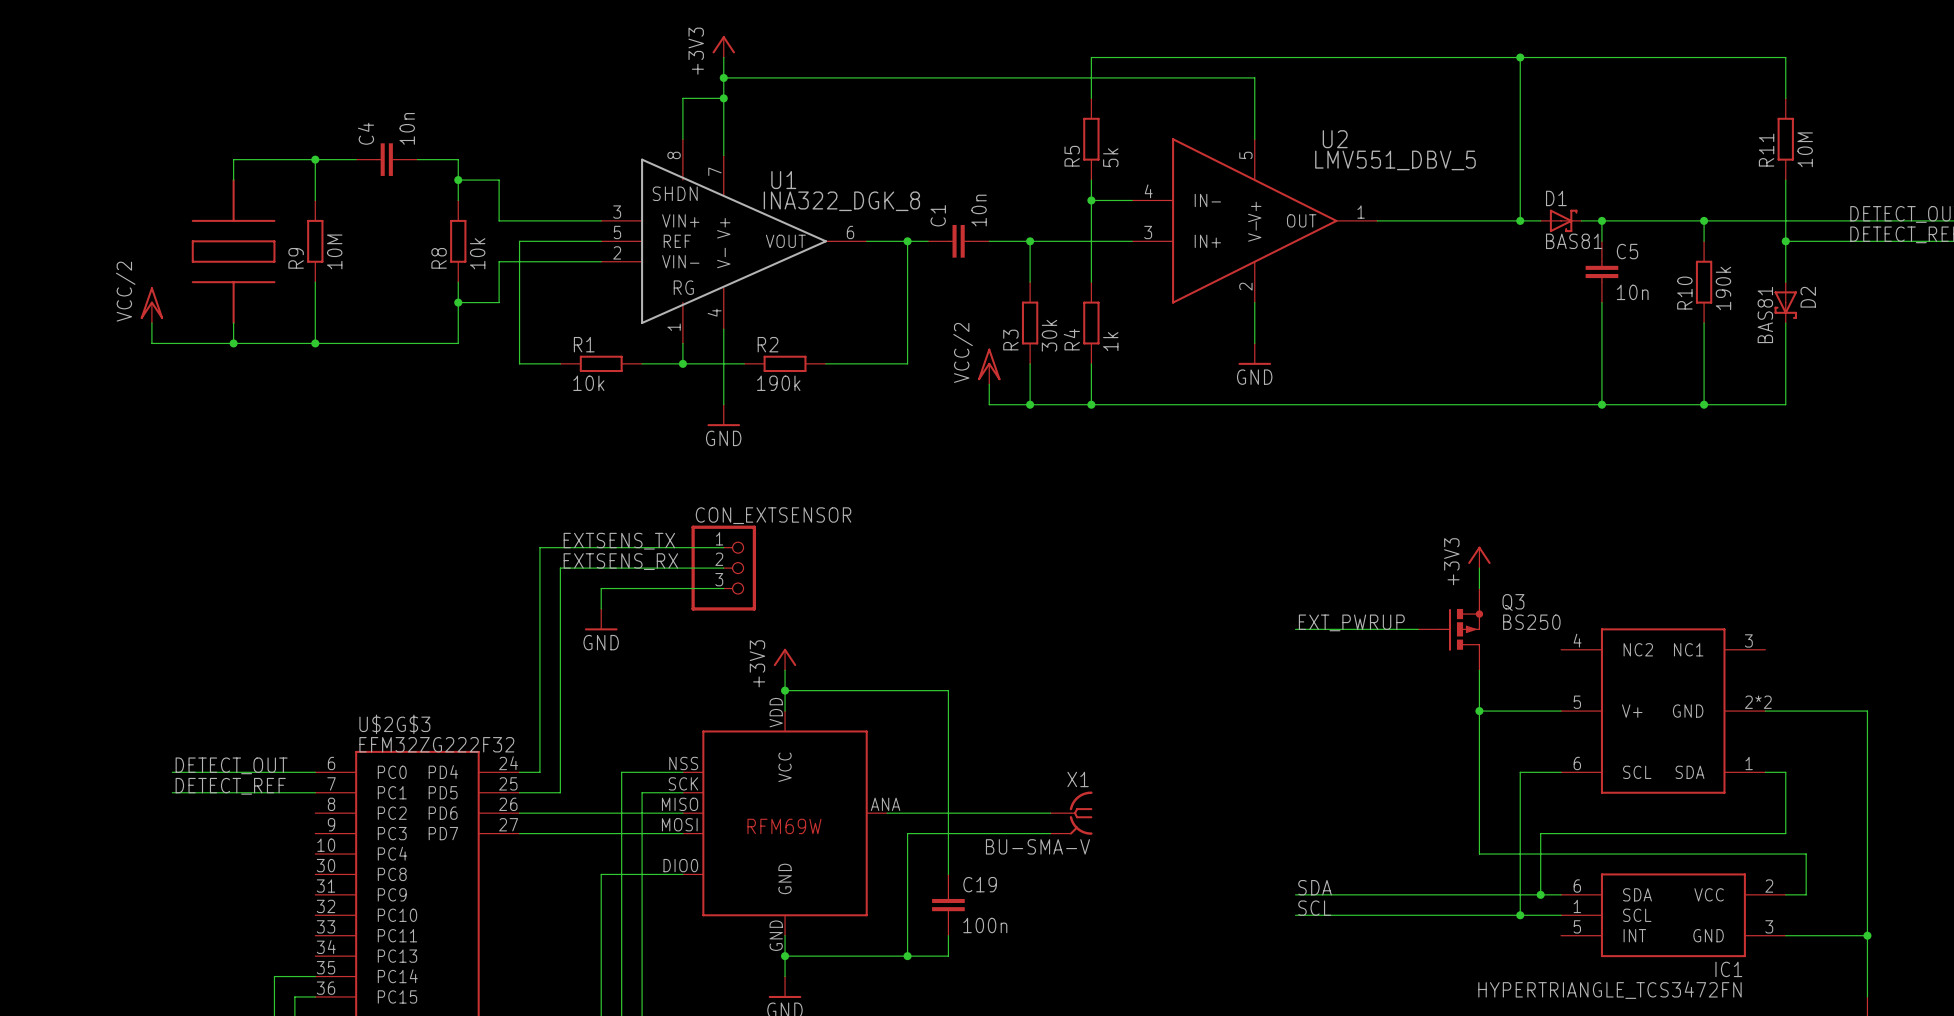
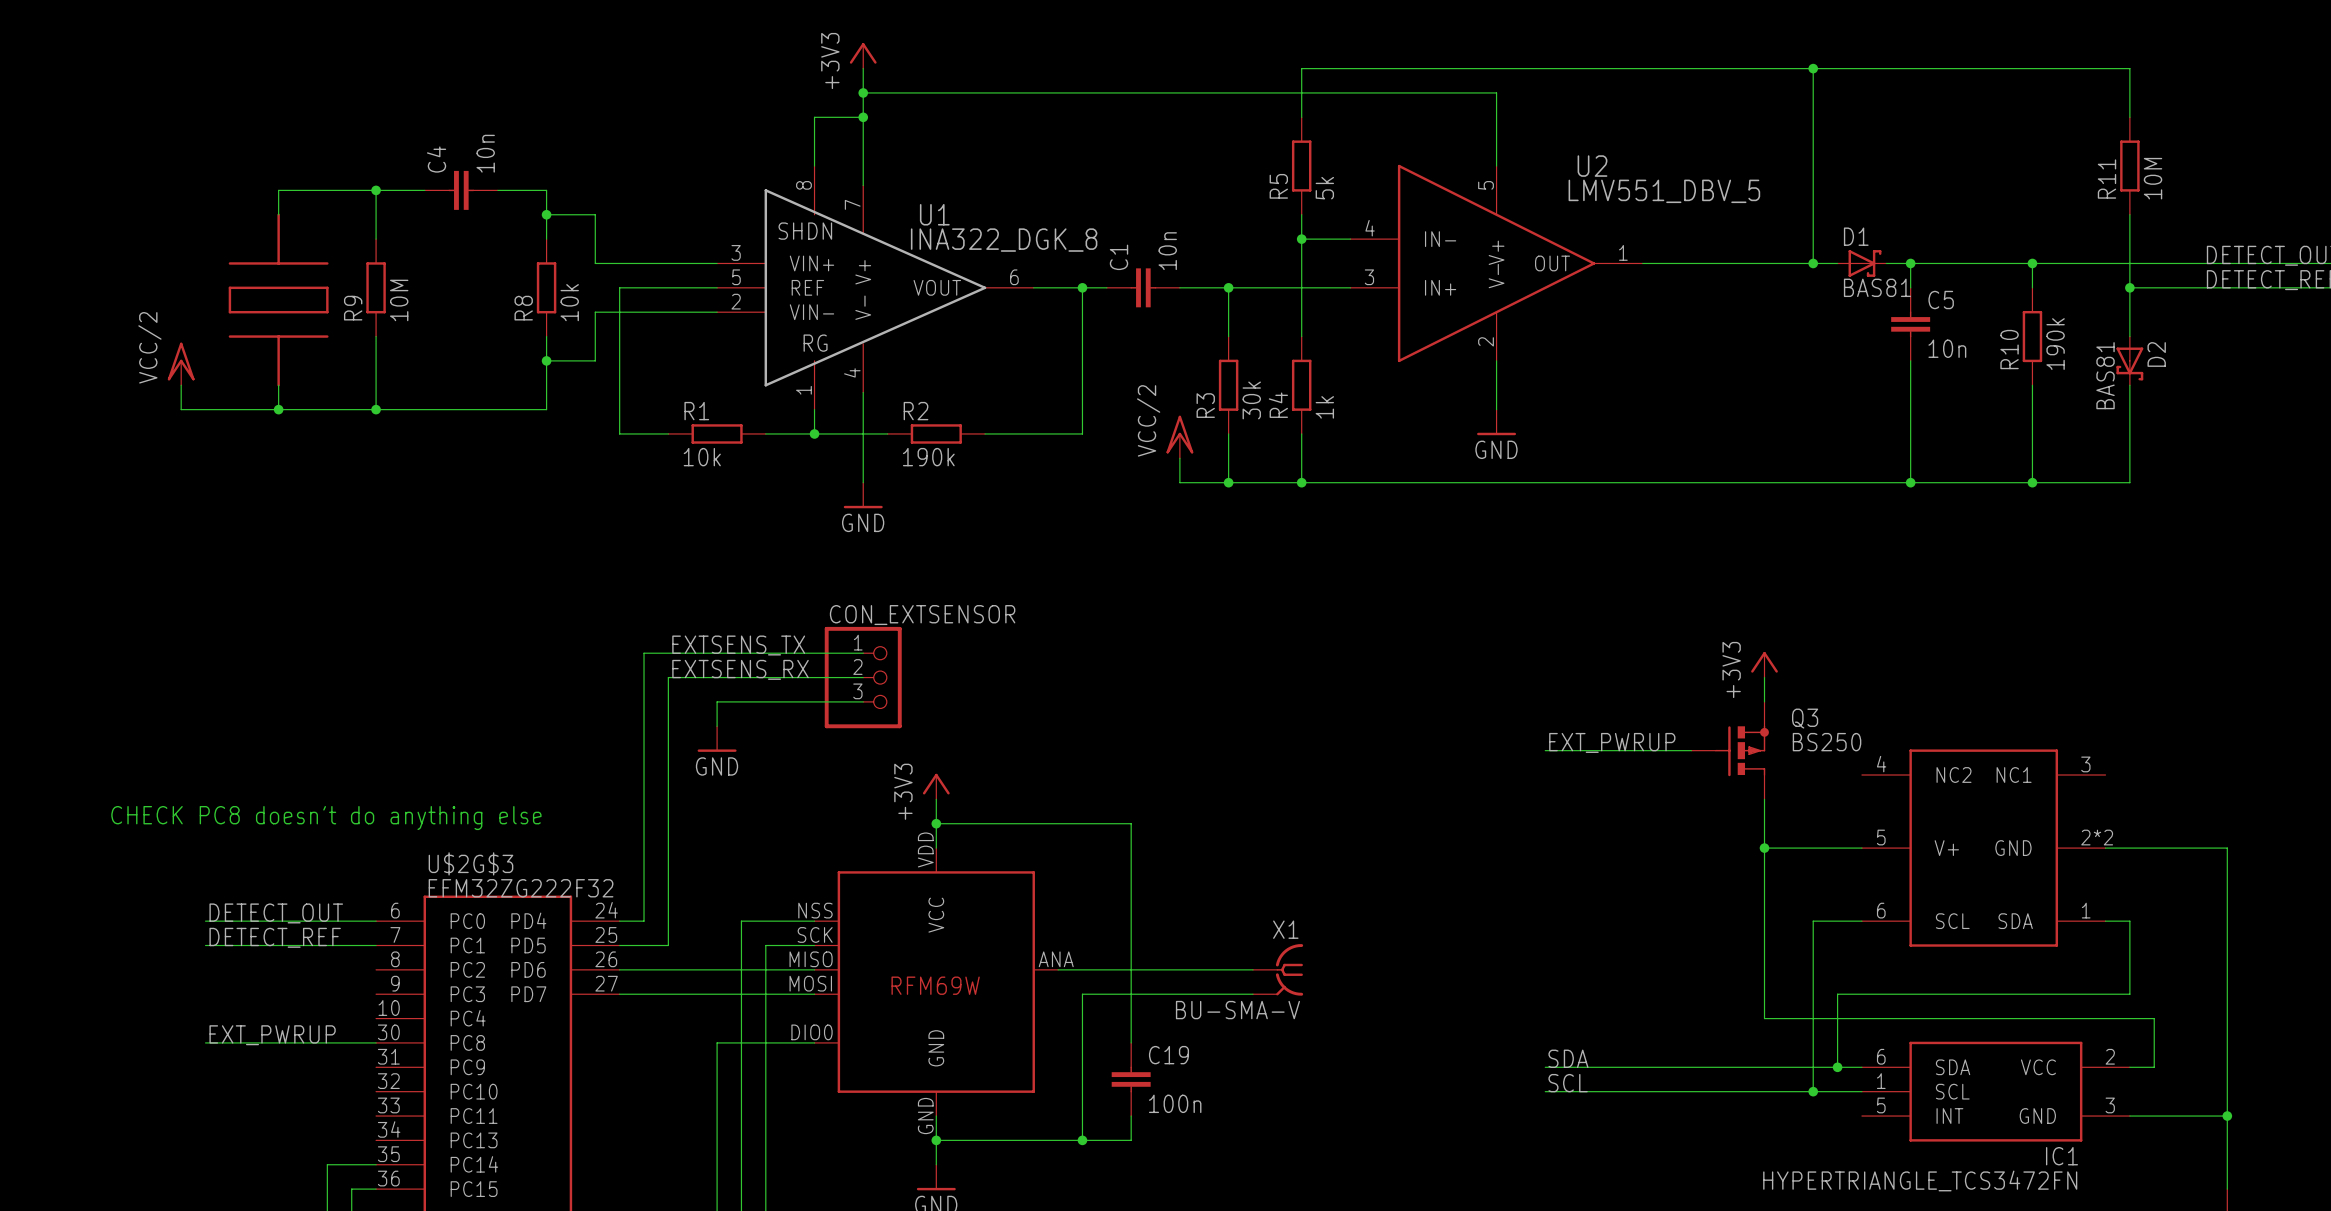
text: none -> CHECK PC8 doesn't do anything else (326, 818)
label: none -> EXT_PWRUP (272, 1035)
wire: none -> (205, 1042) (376, 1042)

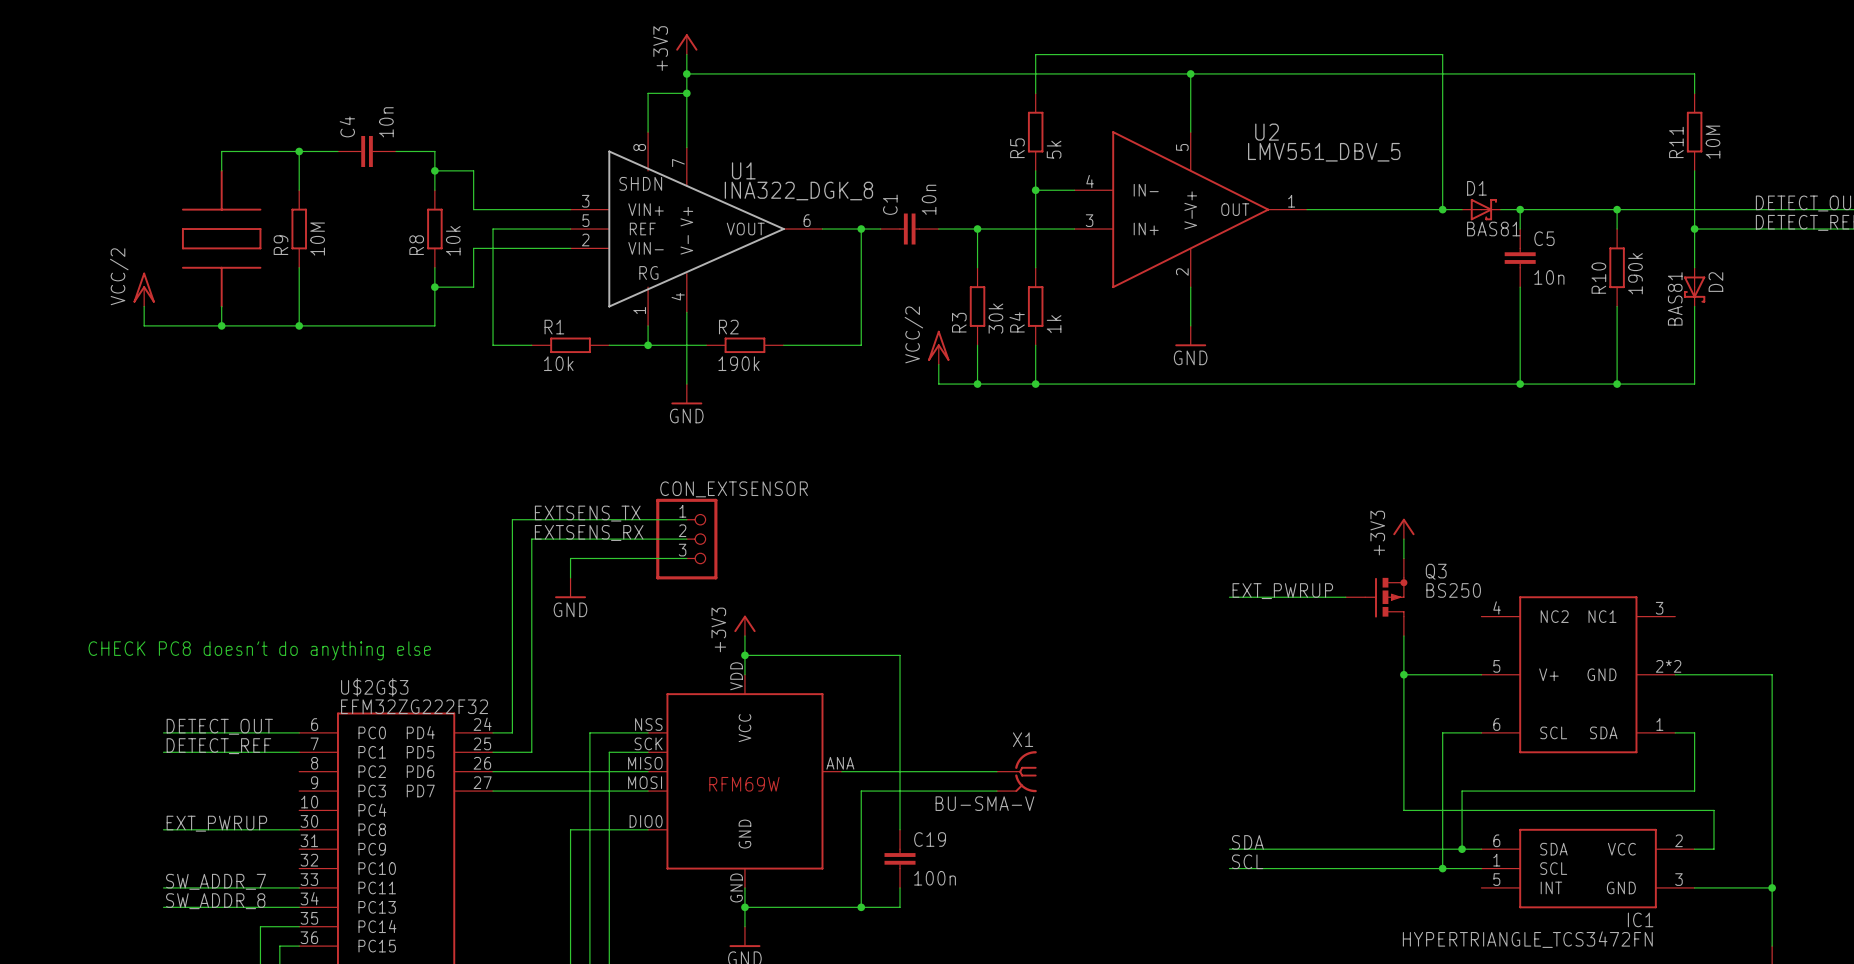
wire: (1813, 68) (2129, 68) (2129, 92) -> (1190, 73) (1694, 73)
junction: (1813, 68) -> none
junction: none -> (1190, 73)
label: none -> SW_ADDR_7 (216, 881)
wire: none -> (163, 887) (299, 887)
label: none -> SW_ADDR_8 (215, 901)
wire: none -> (163, 907) (299, 907)

